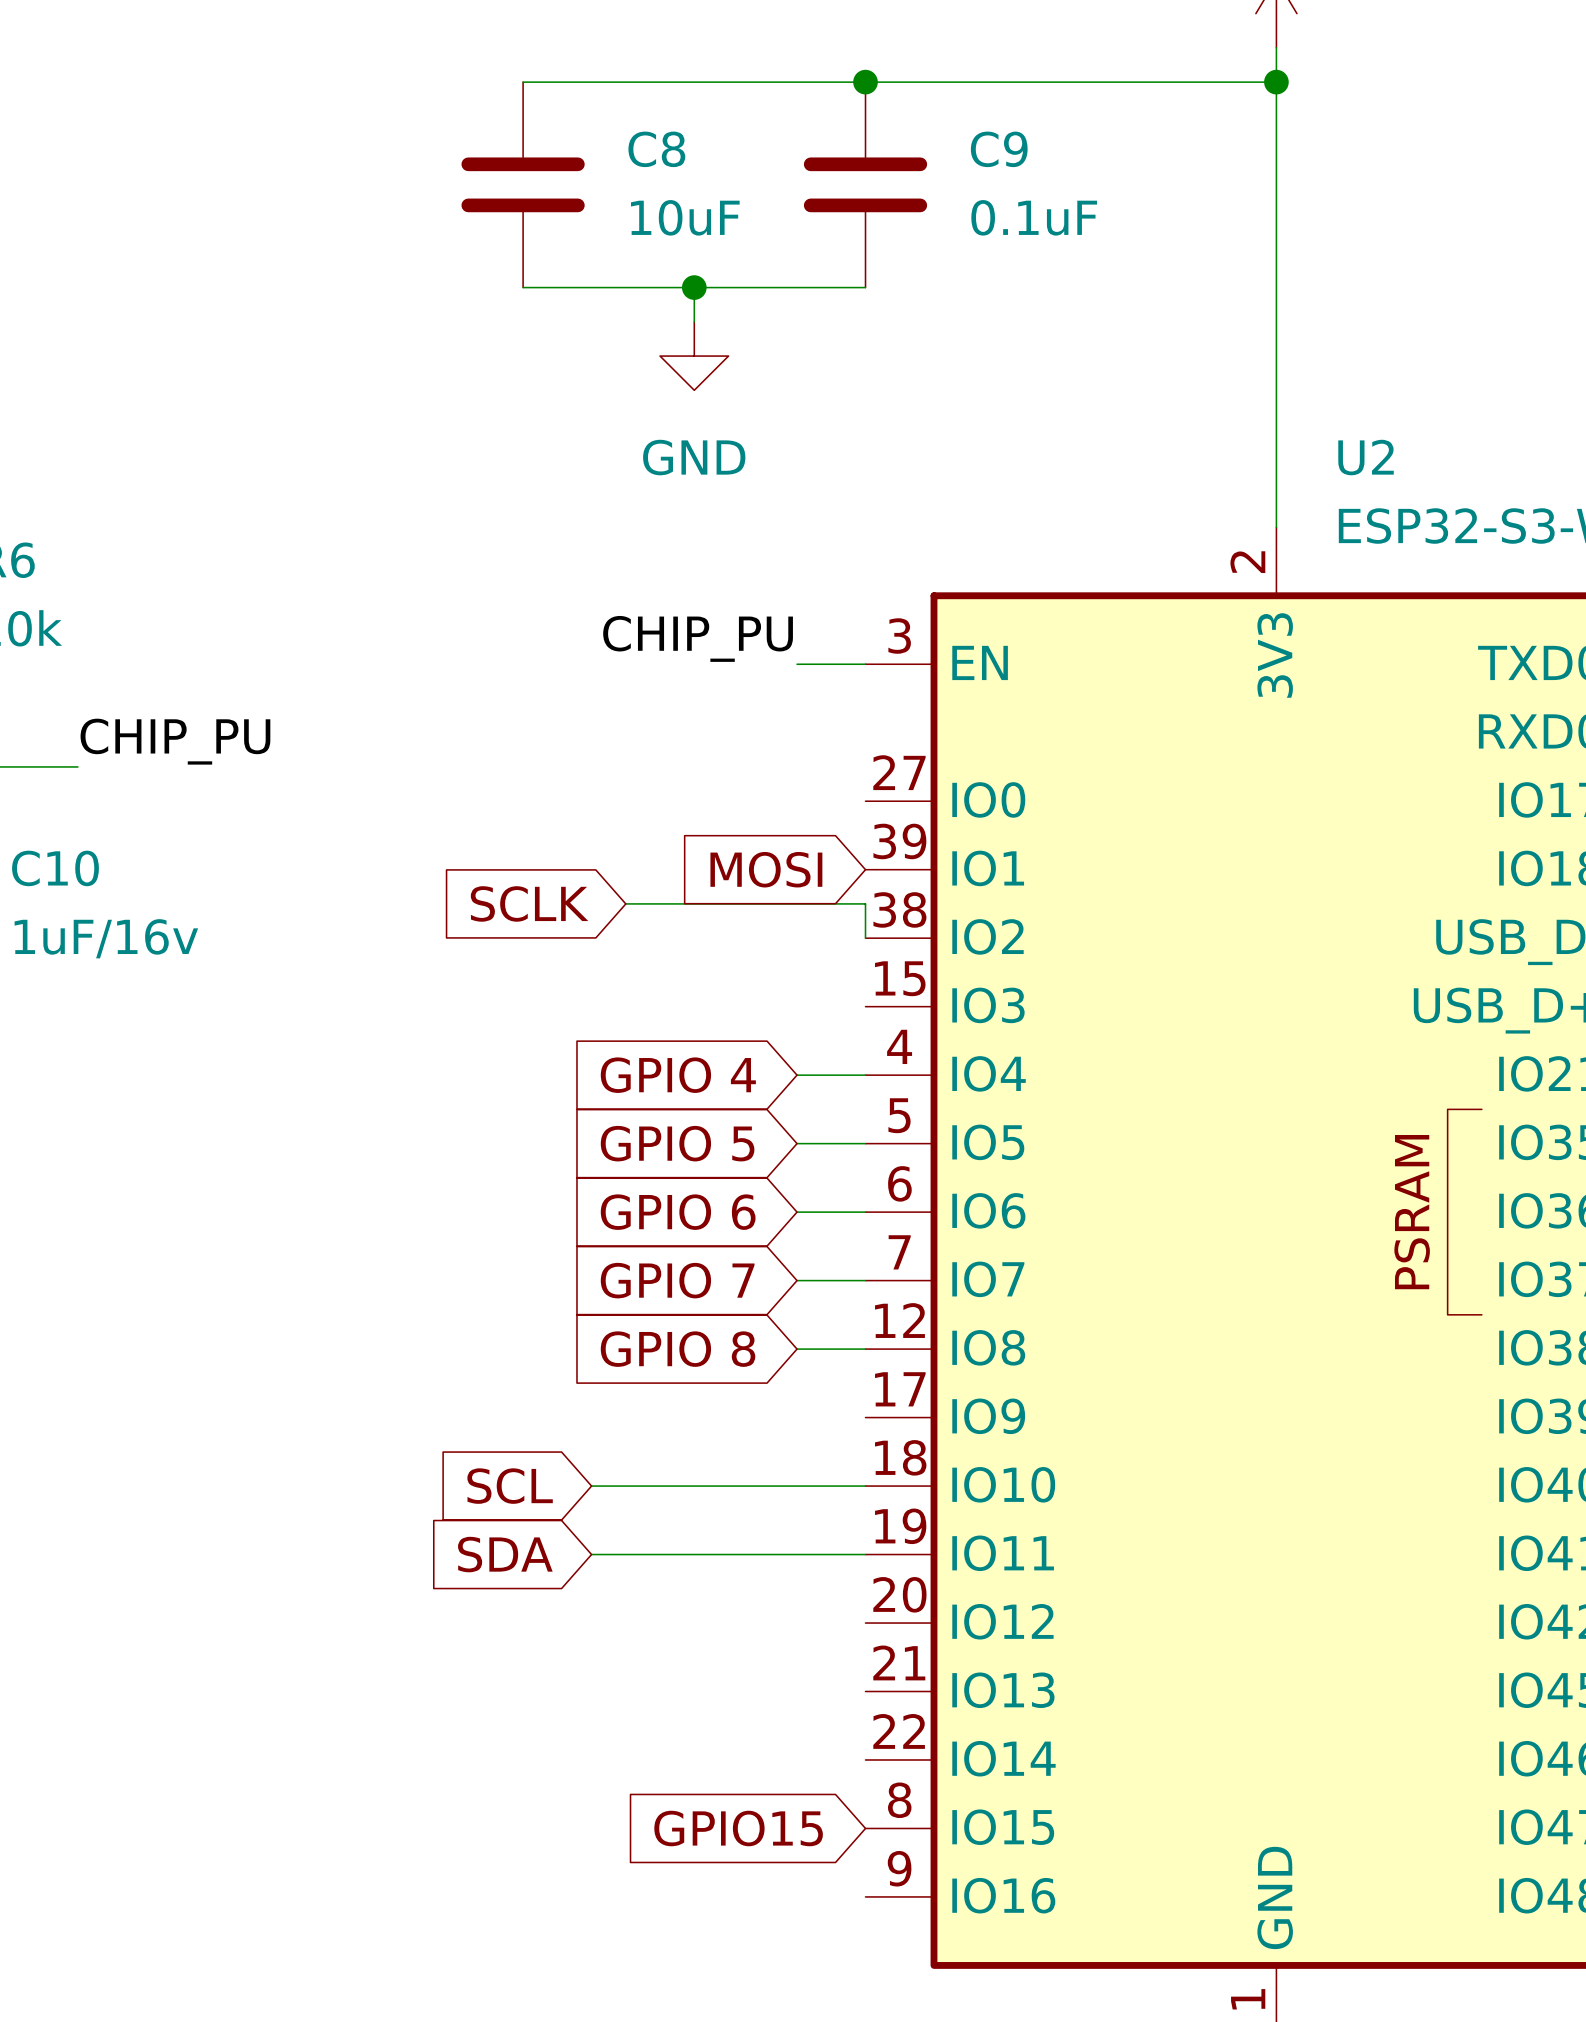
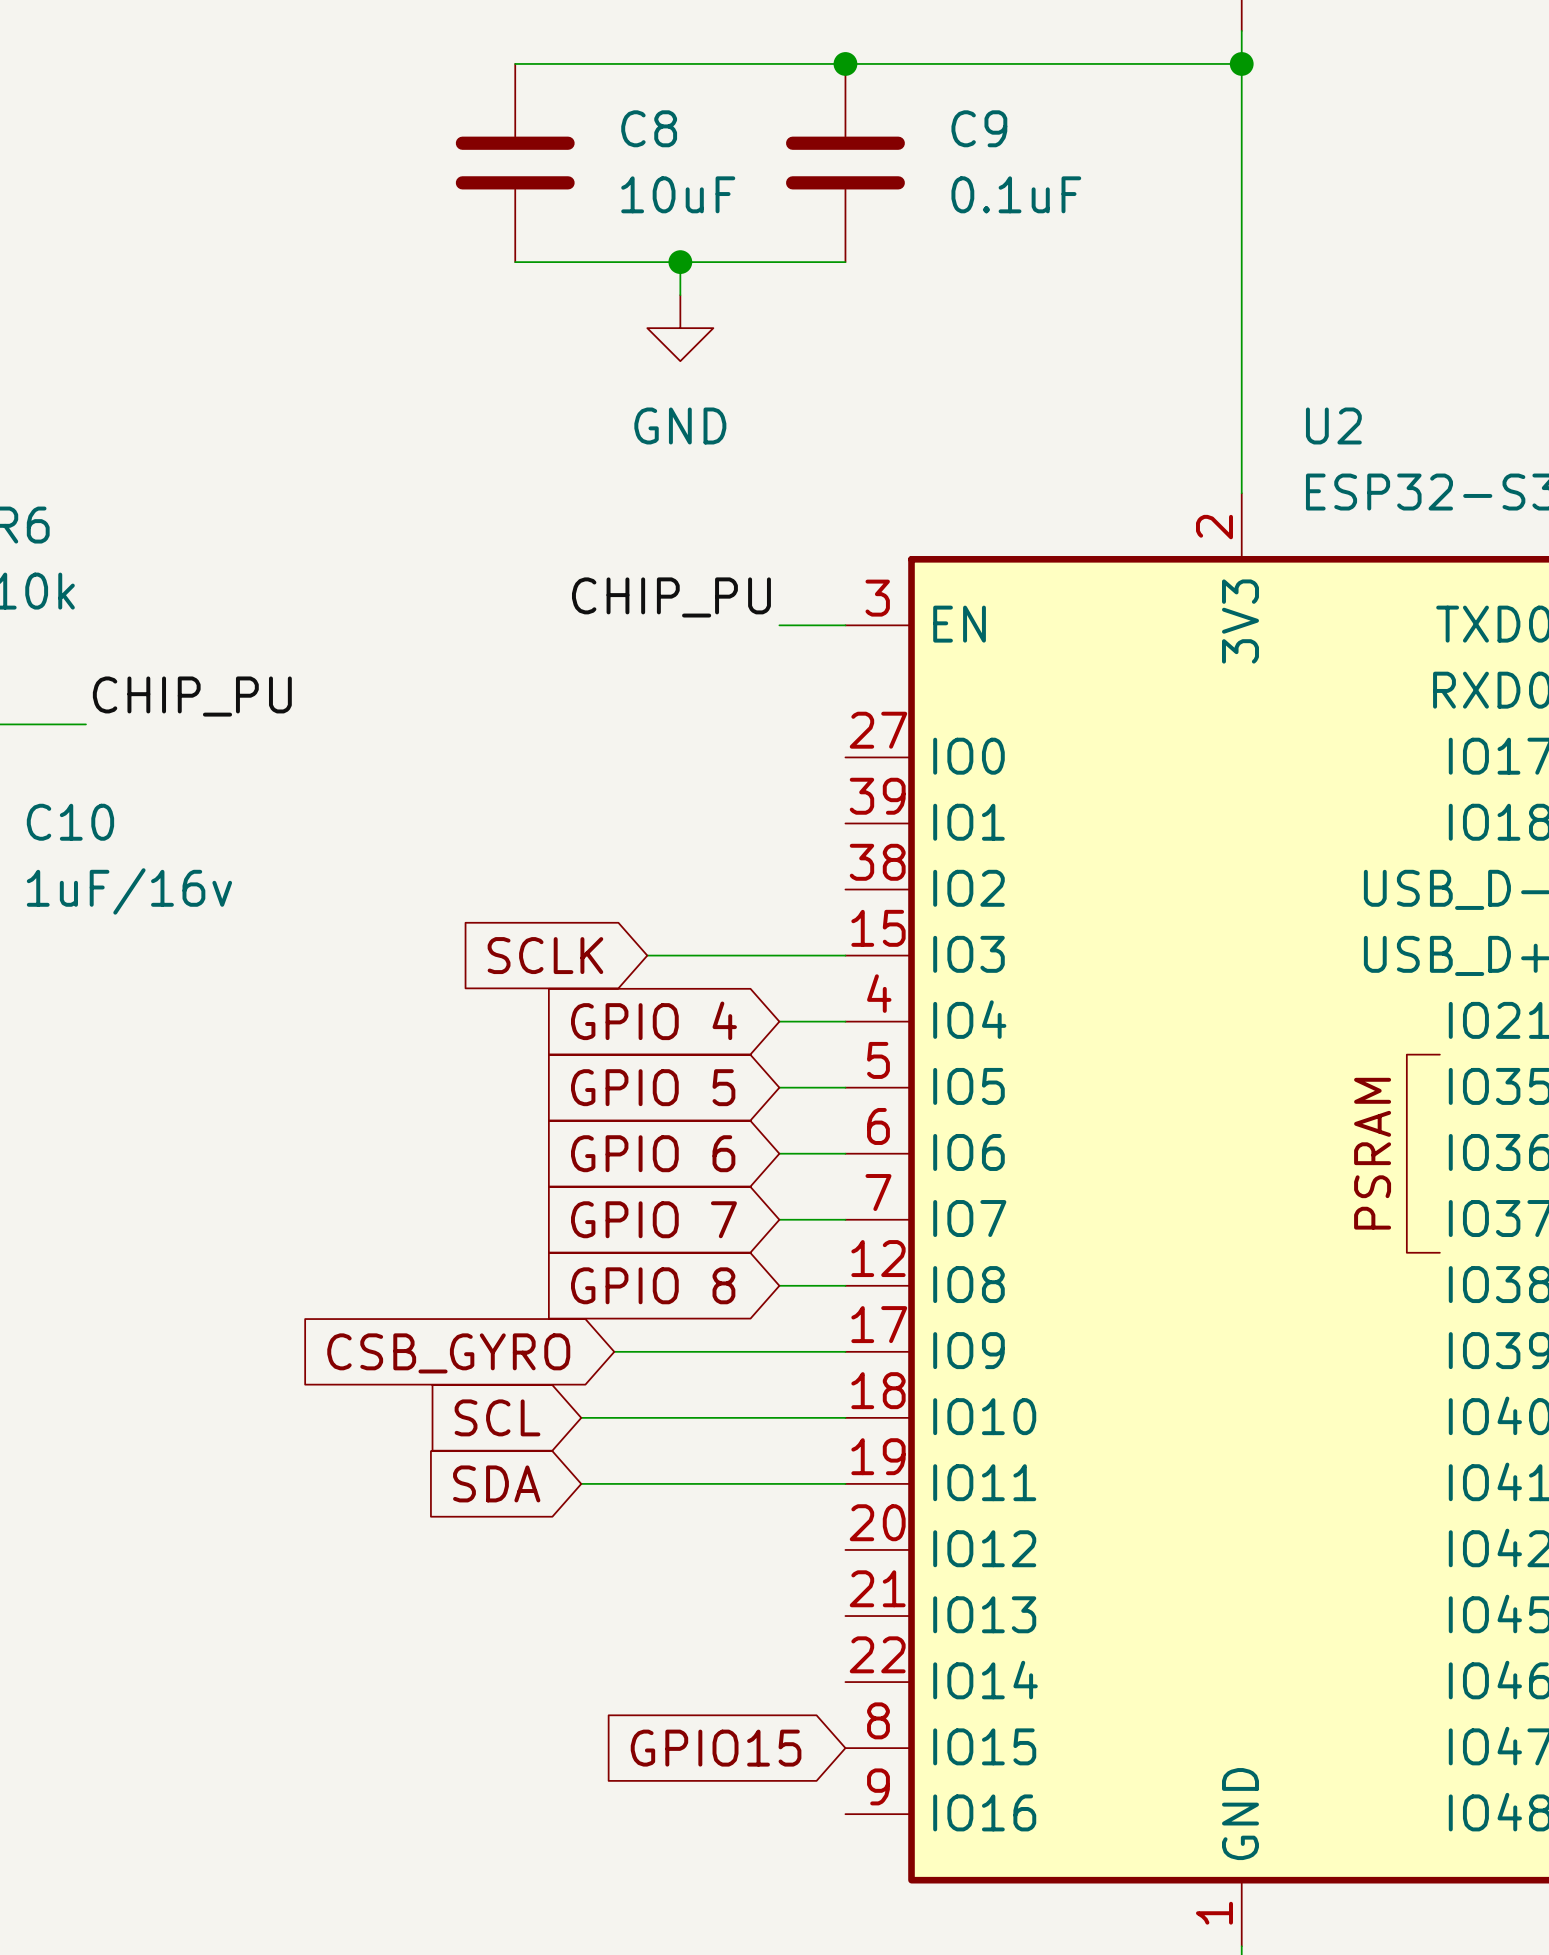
global label: MOSI (766, 869) -> none
global label position: SCLK (529, 903) -> SCLK (545, 955)
wire: (625, 903) (865, 903) (865, 938) -> none
wire: none -> (647, 955) (845, 955)
wire: none -> (614, 1351) (845, 1351)
global label: none -> CSB_GYRO (448, 1353)

